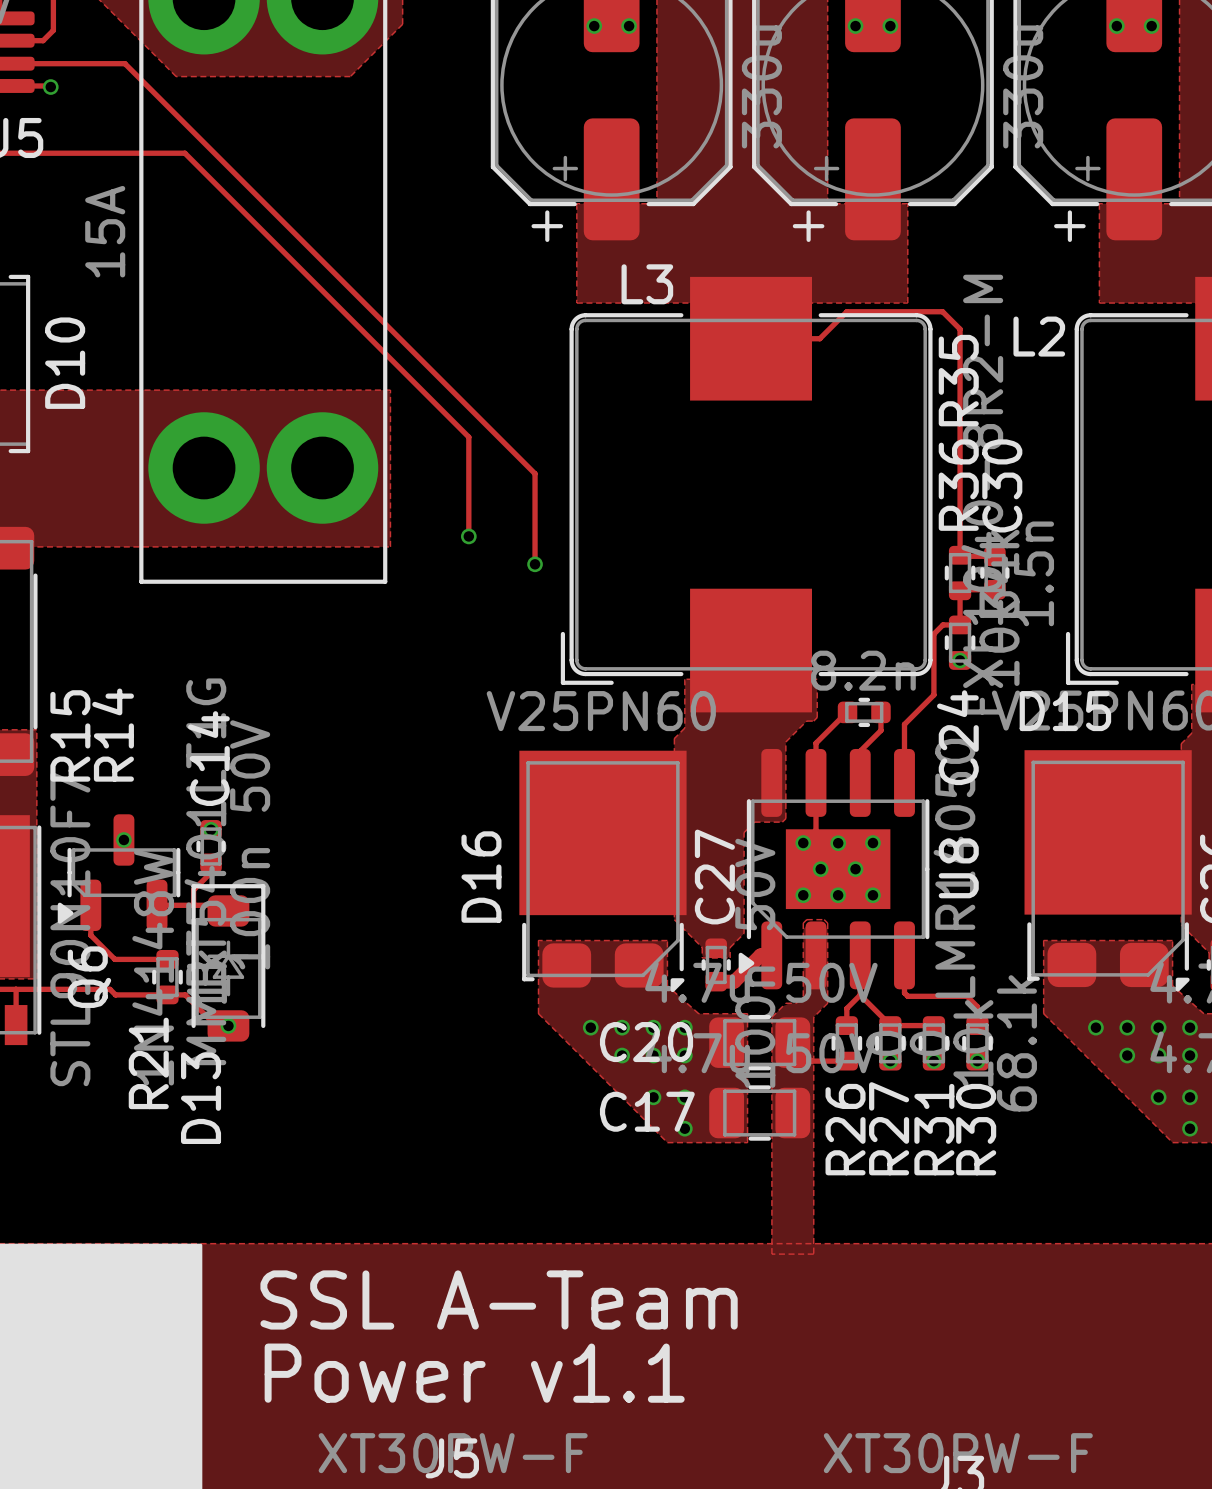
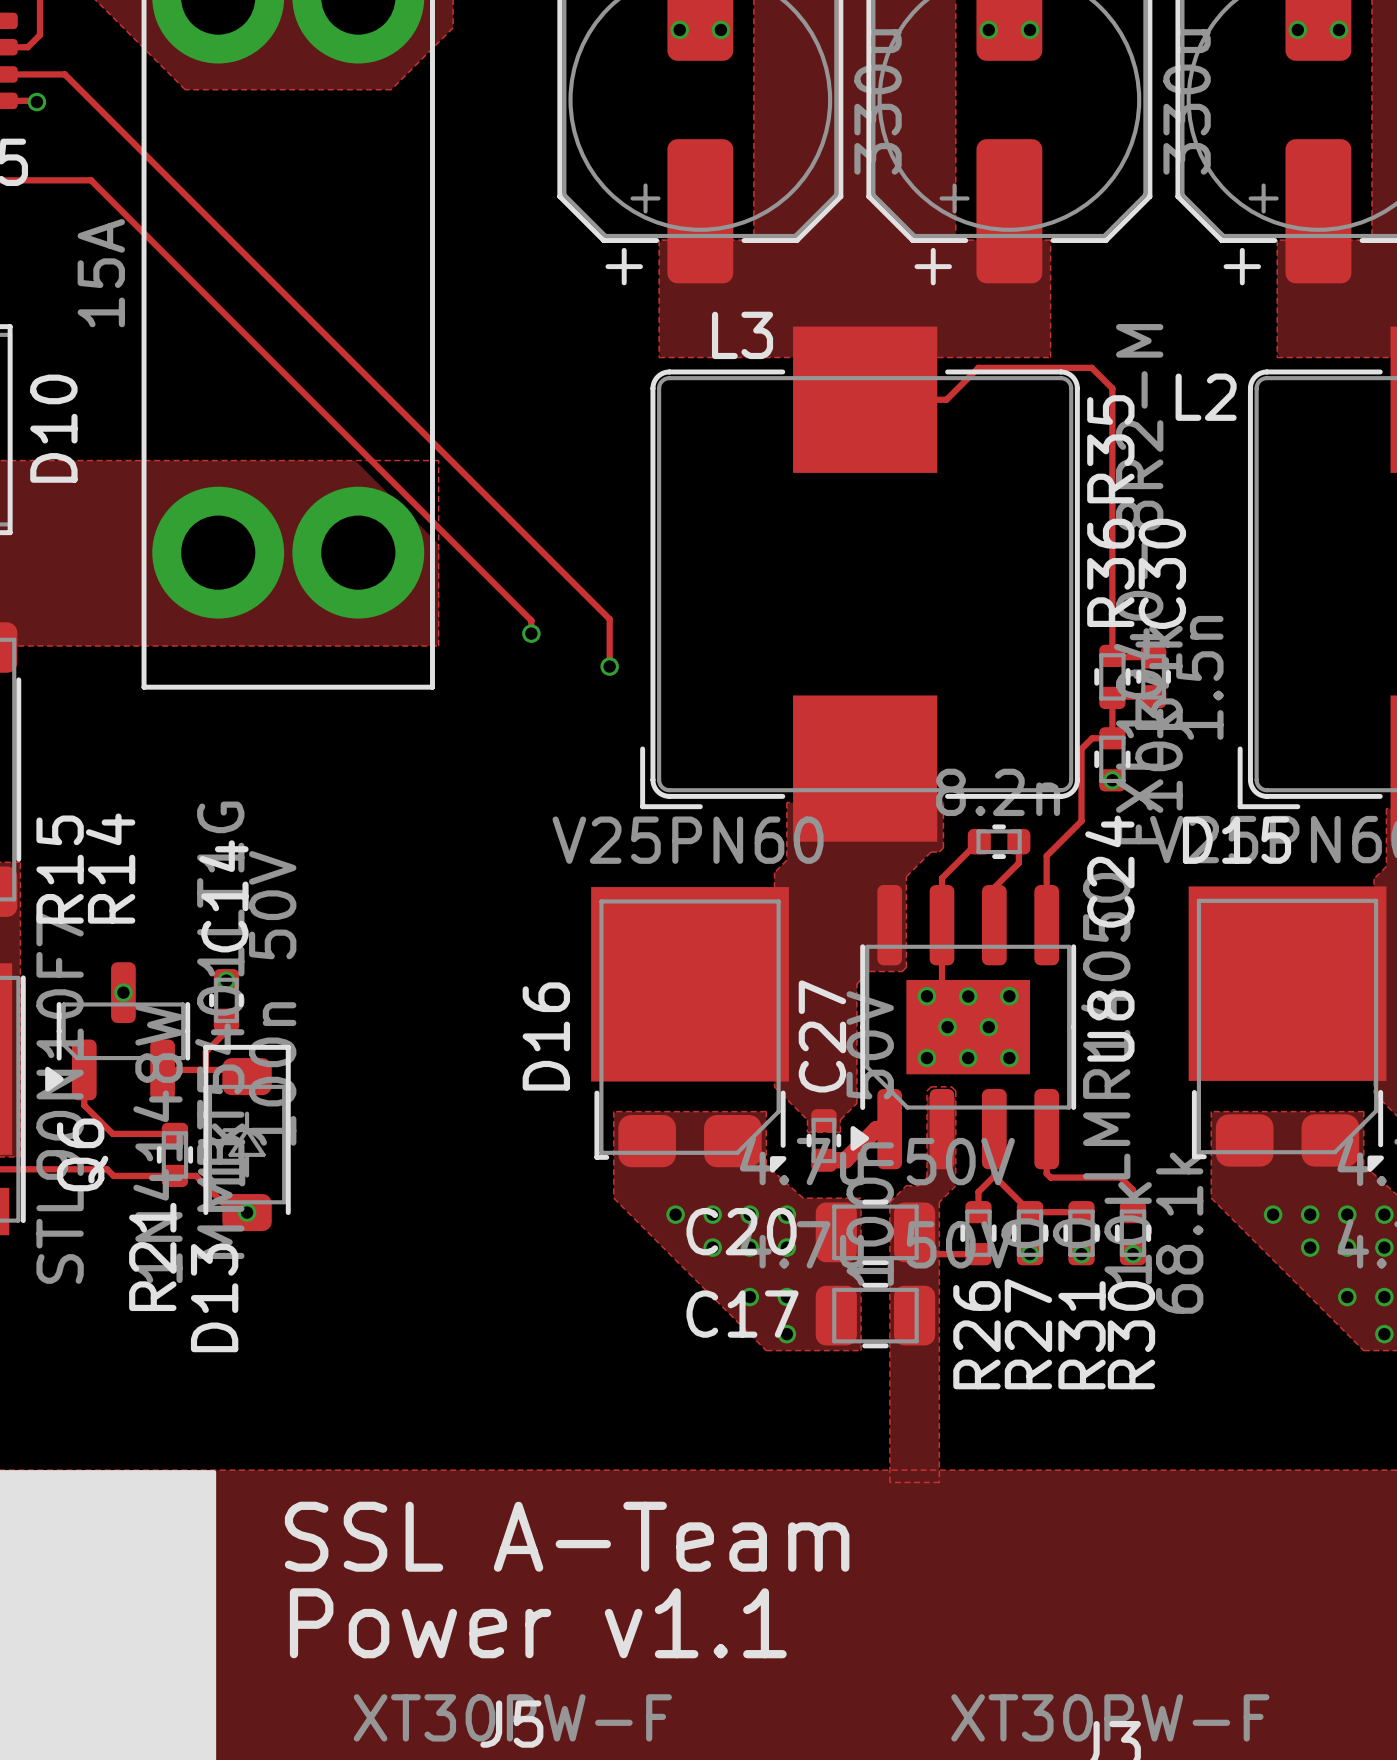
track: (74, 63) (124, 63) (535, 473) (535, 524) -> (64, 74) (609, 619)
track: (96, 153) (184, 153) (468, 437) (468, 525) -> (91, 180) (531, 620)

